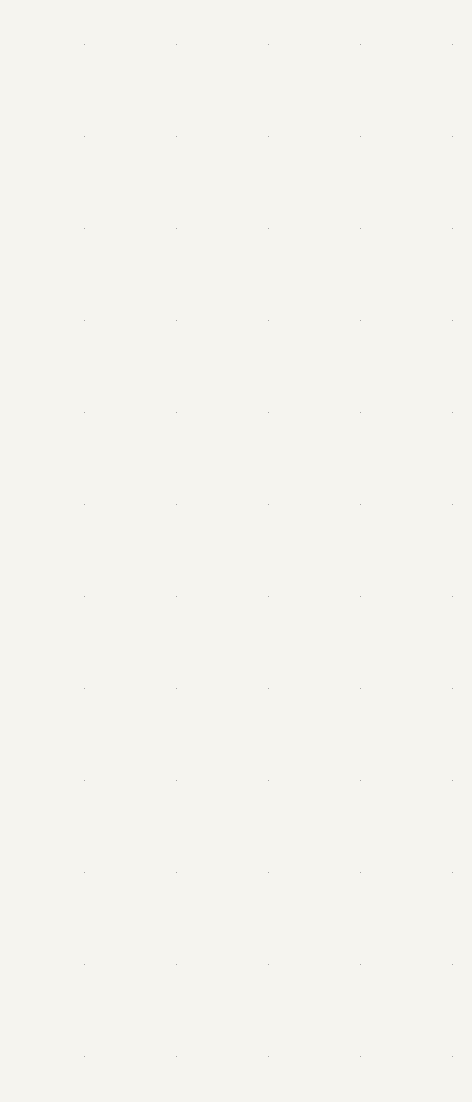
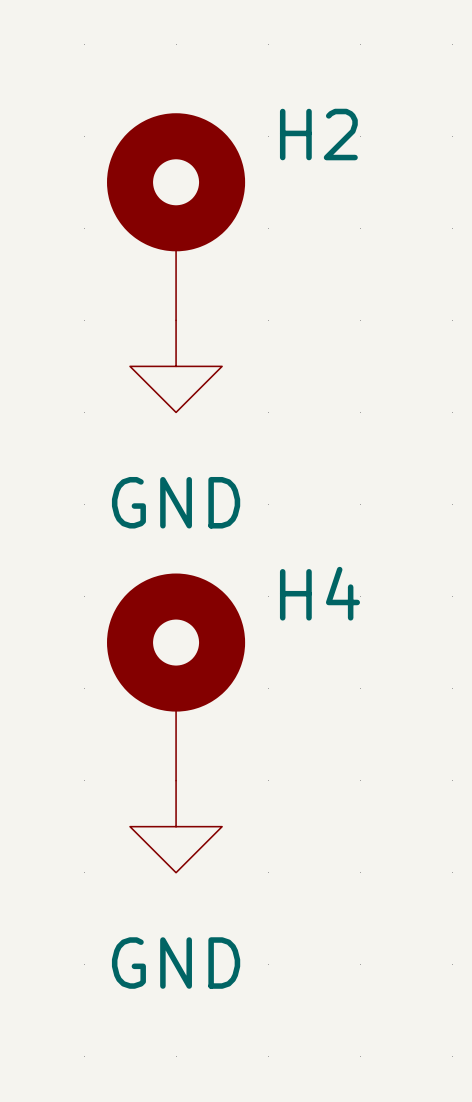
H2: none -> (176, 216)
power symbol: none -> GND (176, 366)
H4: none -> (176, 677)
power symbol: none -> GND (176, 826)

